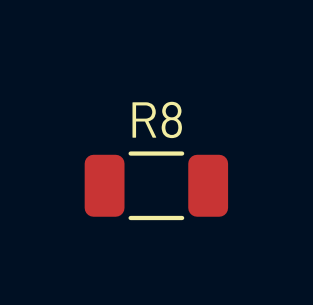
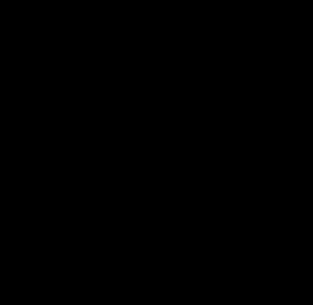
R8: (156, 185) -> none

